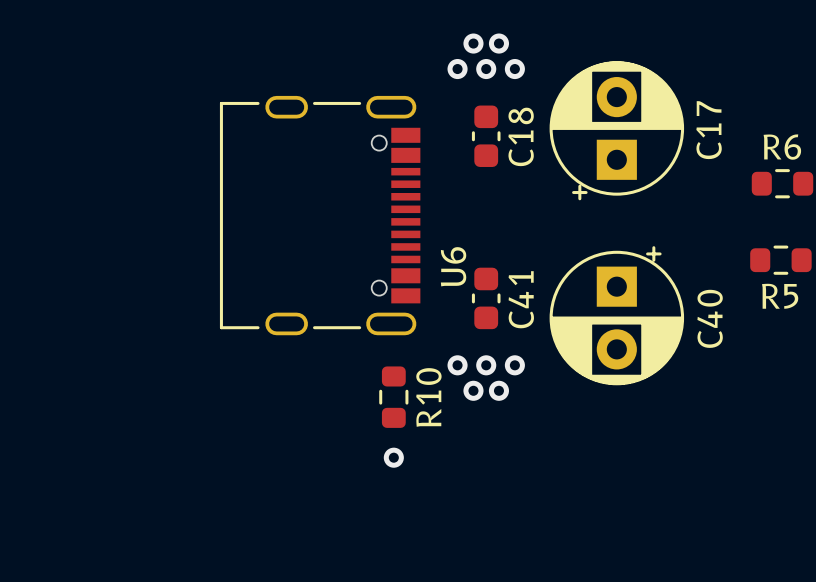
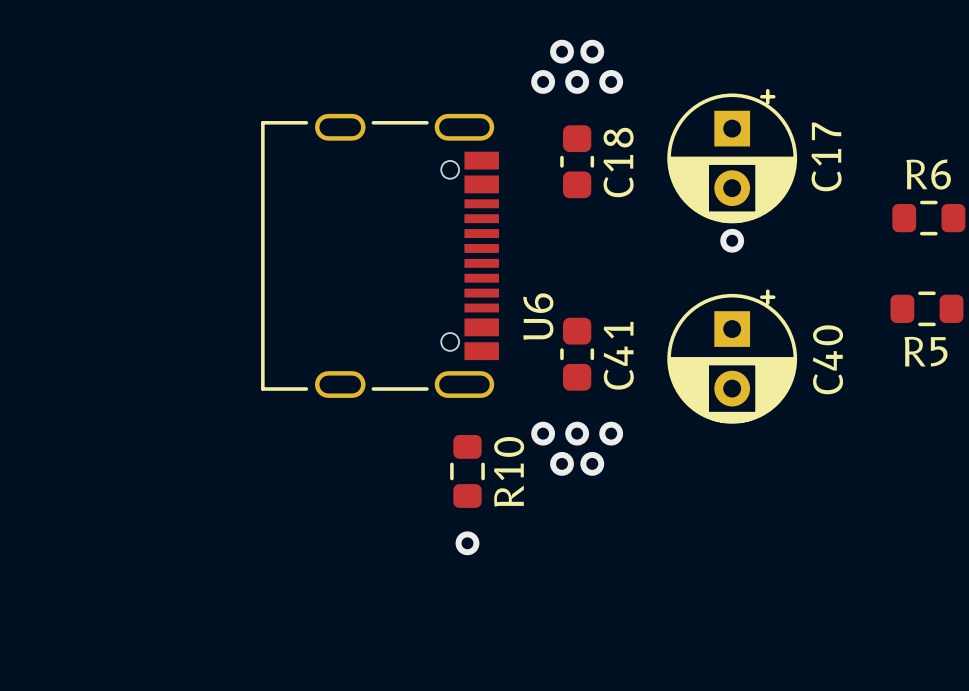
C17 footprint: [549, 61, 685, 201] -> [667, 89, 798, 224]
via: none -> (732, 240)
C40 footprint: [549, 246, 685, 386] -> [667, 289, 798, 424]

